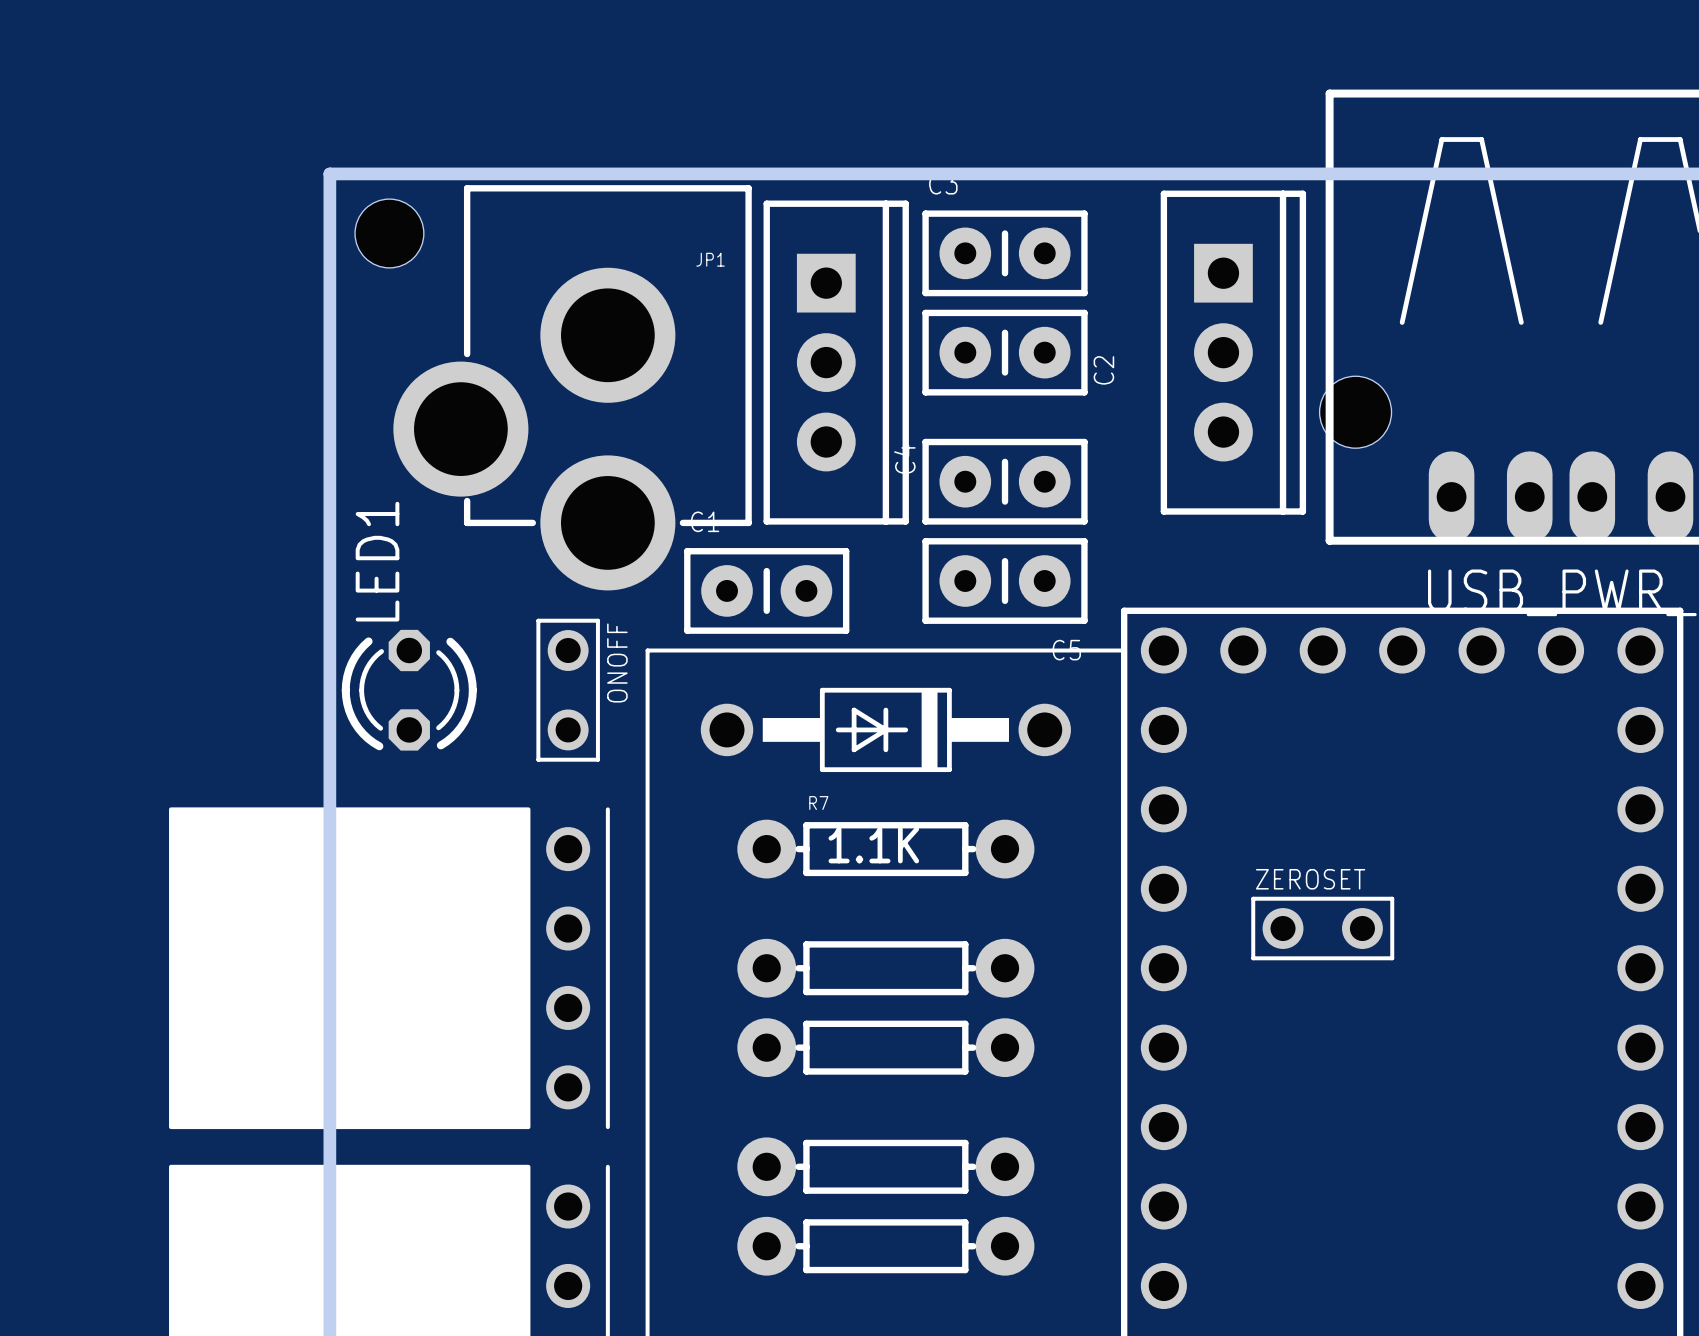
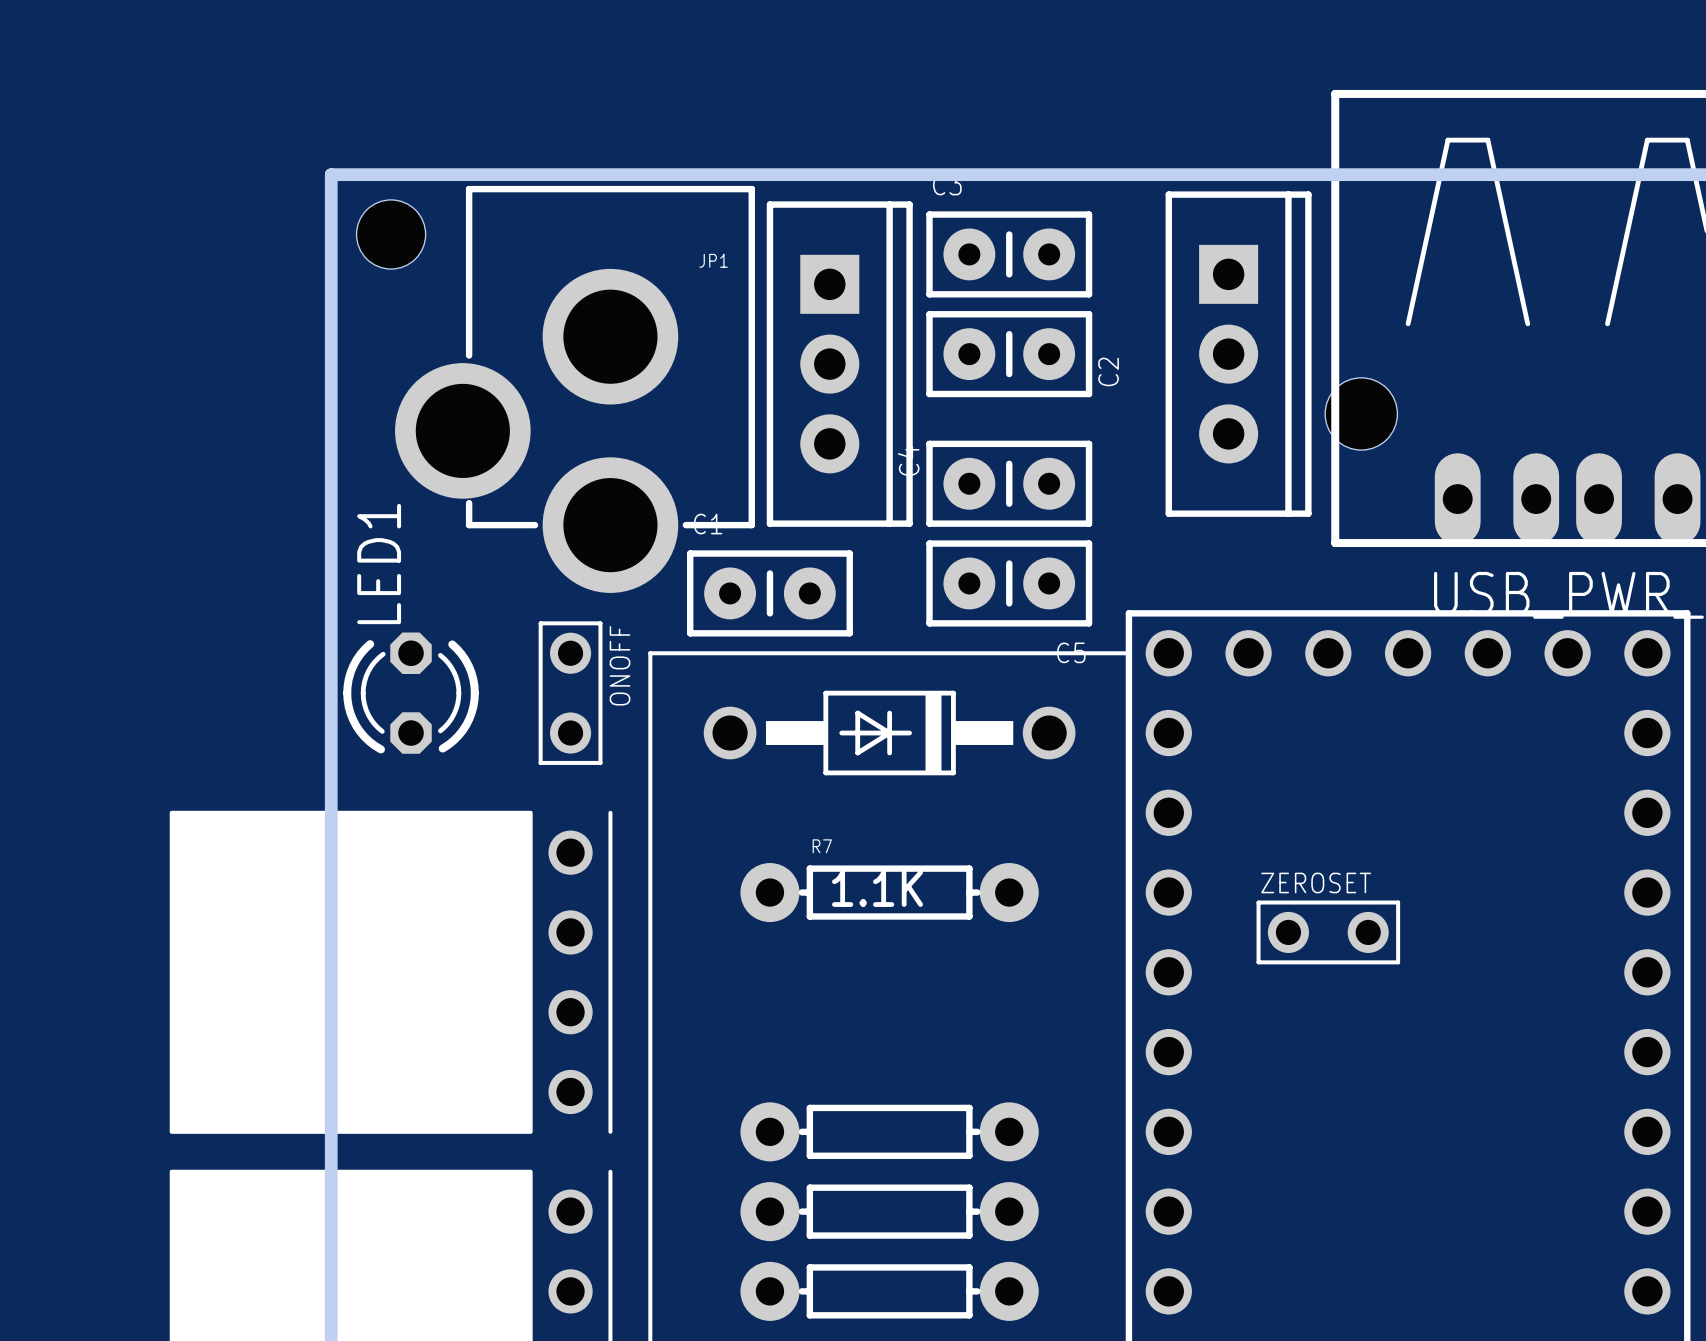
R7 position: (885, 849) -> (889, 892)
part: (885, 968) -> none
part: (885, 1047) -> none
part: none -> (889, 1131)
part: (885, 1166) -> none
part: none -> (889, 1211)
part: (885, 1246) -> none
part: none -> (889, 1291)

